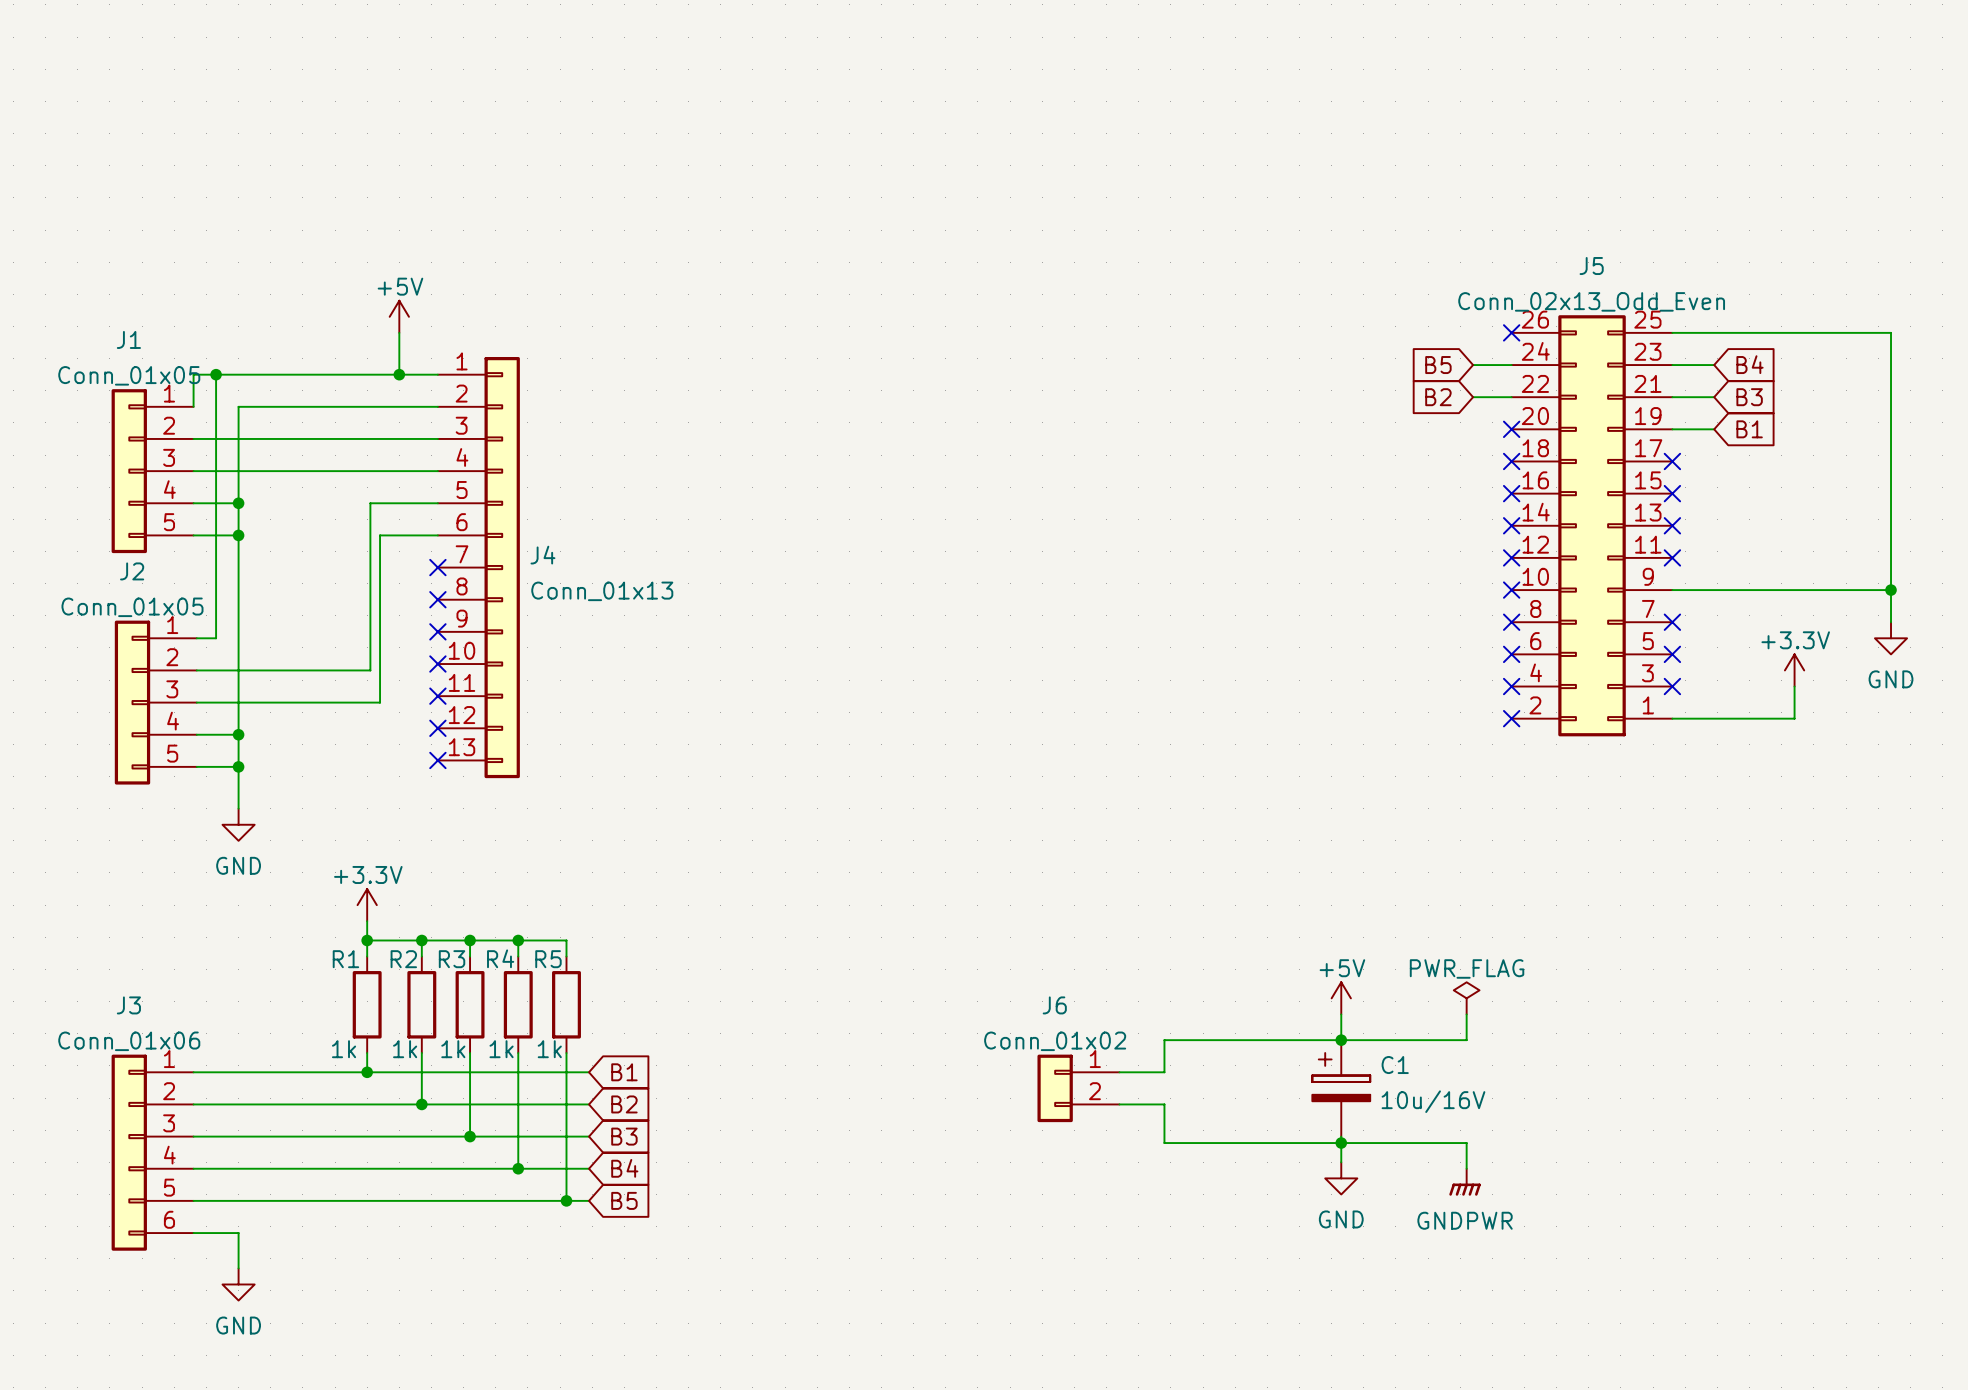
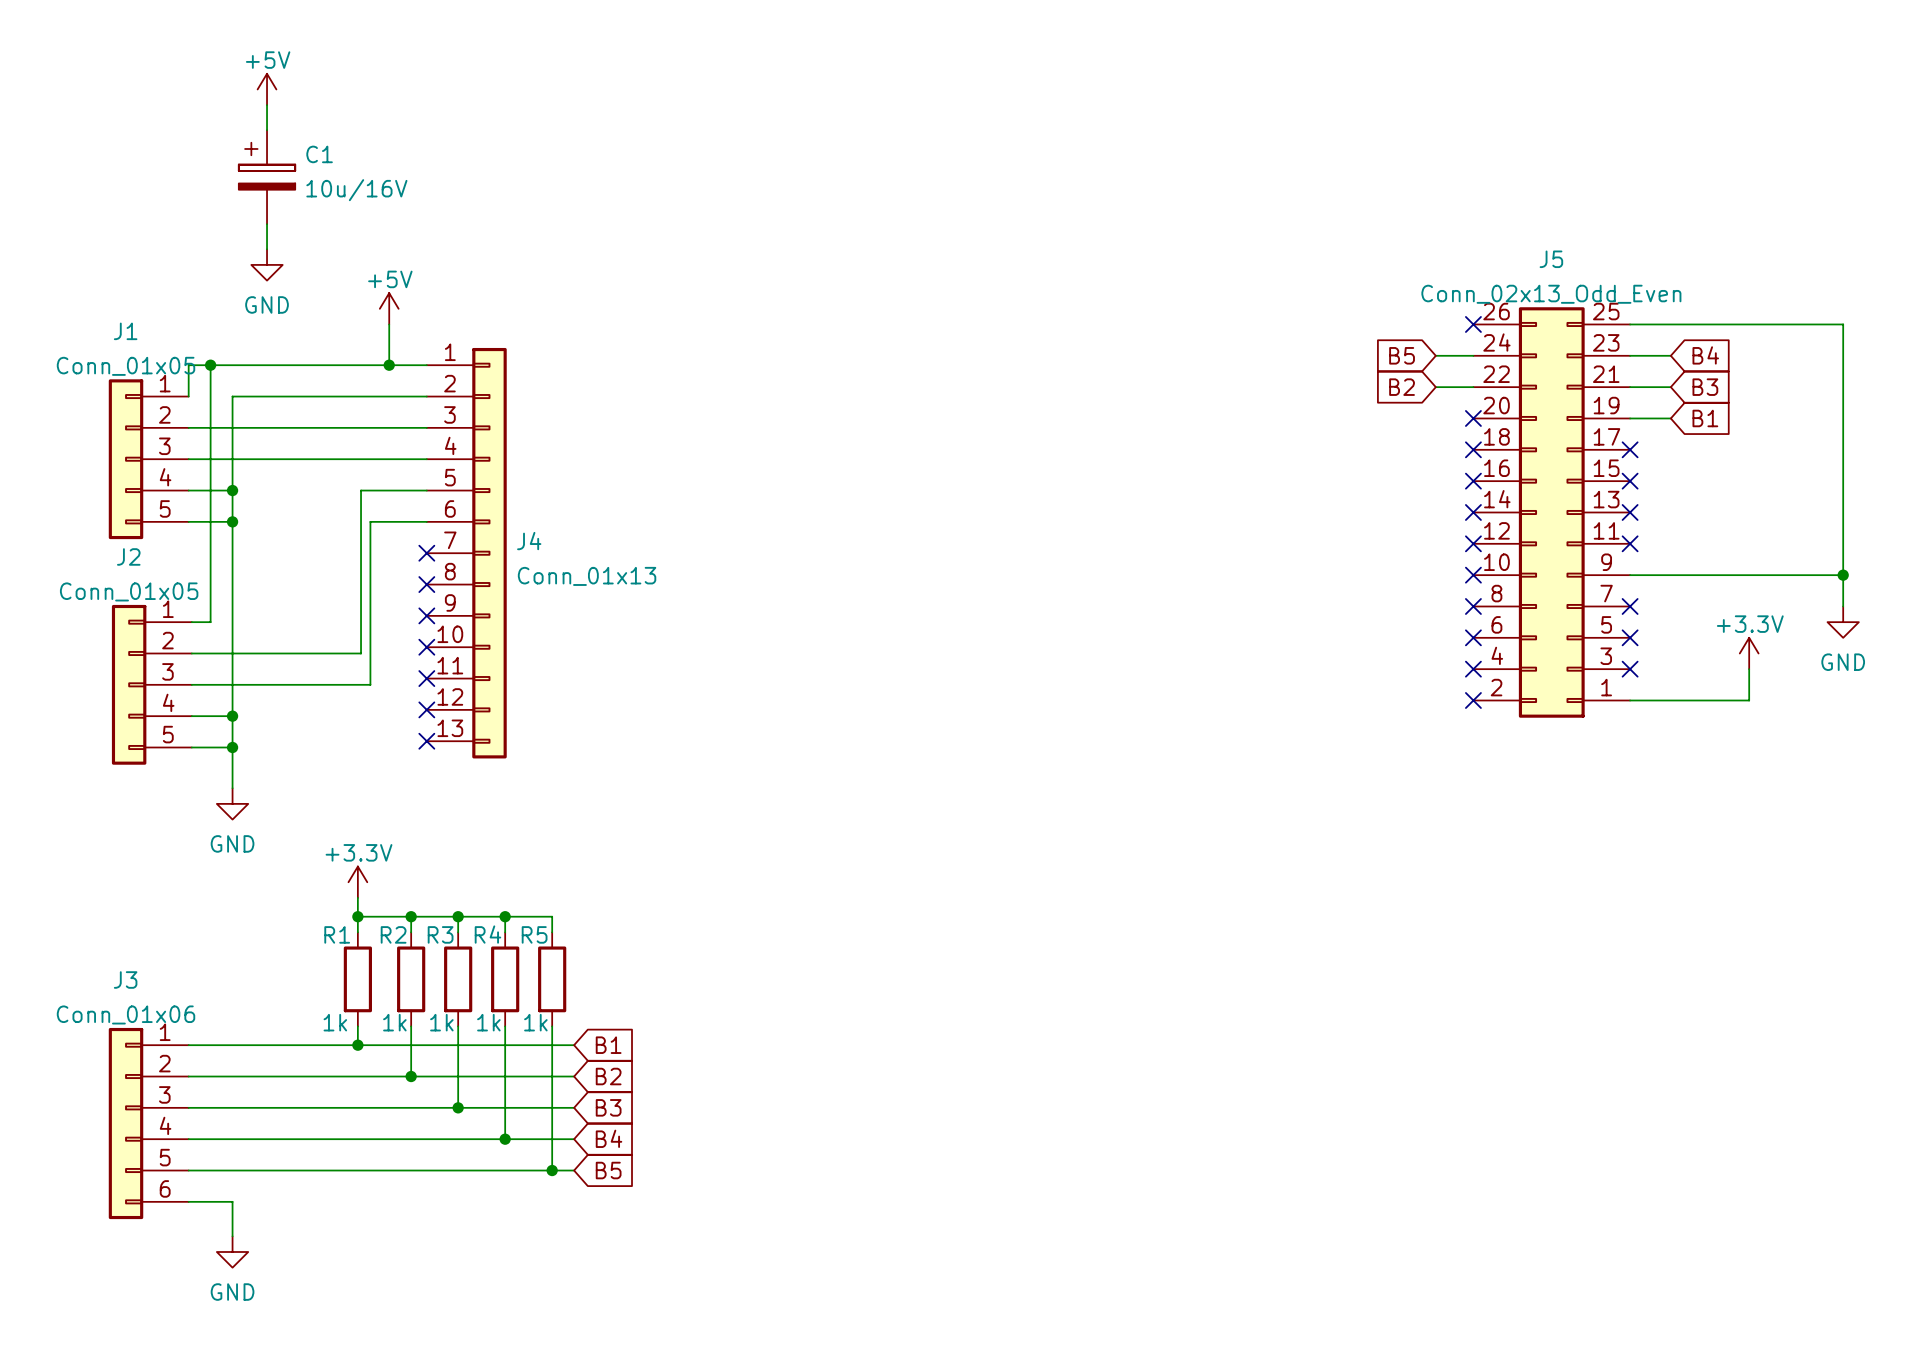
power symbol: none -> +5V (267, 89)
wire: none -> (267, 105) (267, 130)
wire: none -> (267, 224) (267, 249)
power symbol: none -> GND (267, 264)
power symbol: +5V (1341, 998) -> none
power symbol: PWR_FLAG (1466, 998) -> none
wire: (1341, 1014) (1341, 1040) -> none
wire: (1466, 1014) (1466, 1040) (1164, 1040) (1164, 1072) (1119, 1072) -> none
junction: (1341, 1040) -> none
J6: Conn_01x02 (1078, 1088) -> none
C1 position: (1341, 1088) -> (267, 177)
wire: (1119, 1104) (1164, 1104) (1164, 1143) (1466, 1143) (1466, 1168) -> none
wire: (1341, 1136) (1341, 1162) -> none
junction: (1341, 1143) -> none
power symbol: GND (1341, 1178) -> none
power symbol: GNDPWR (1465, 1182) -> none

